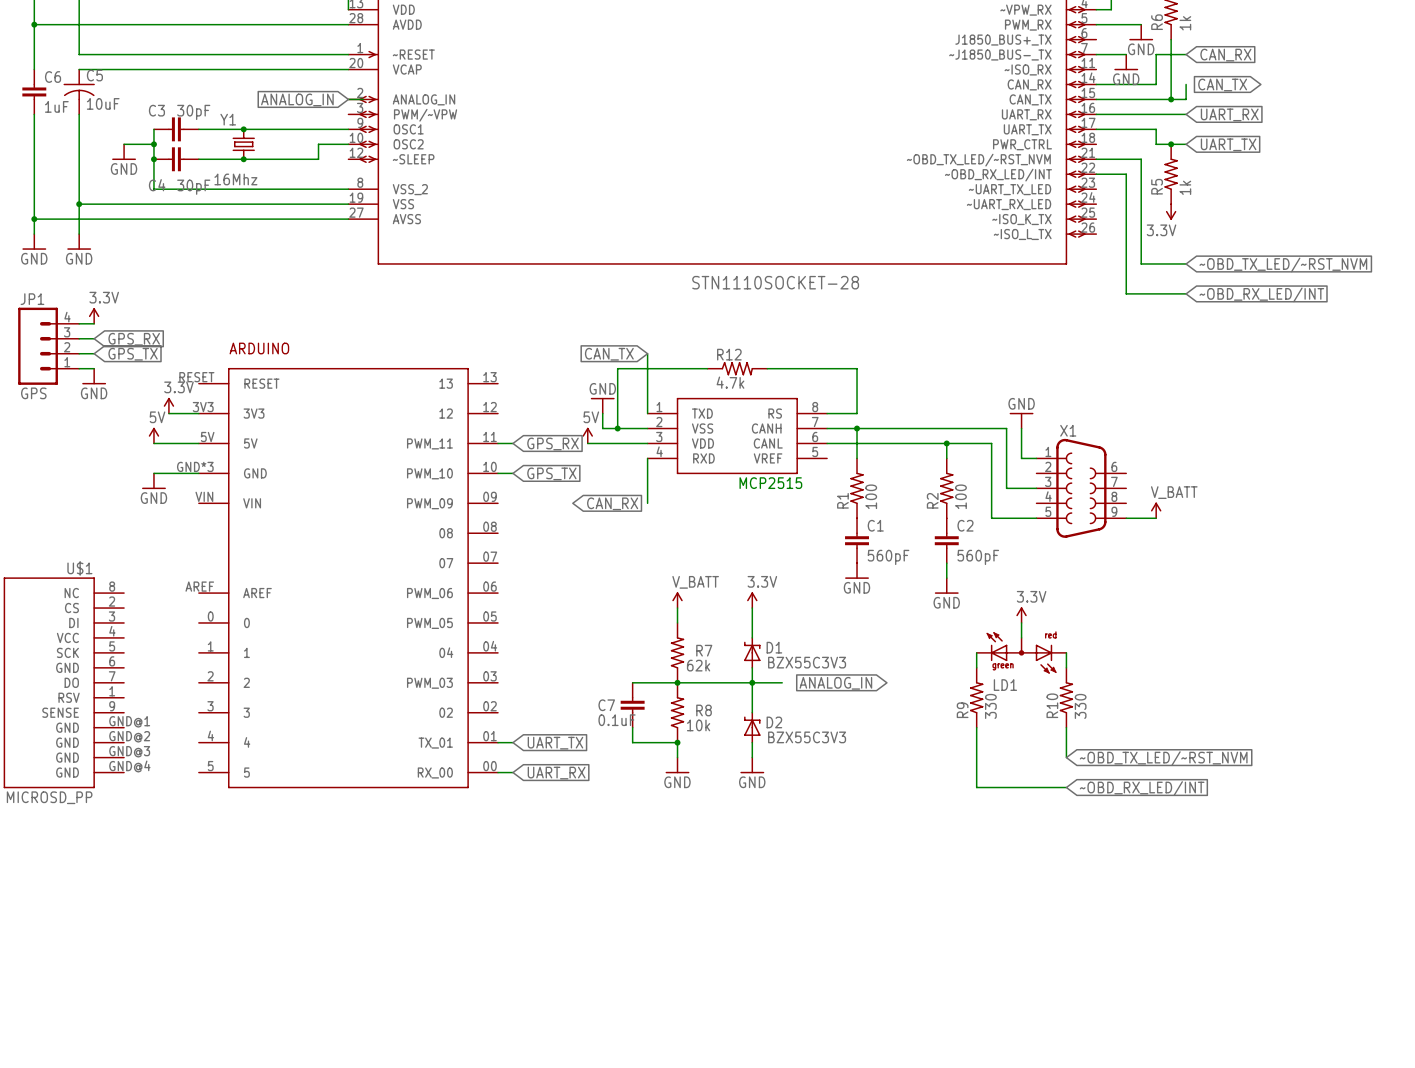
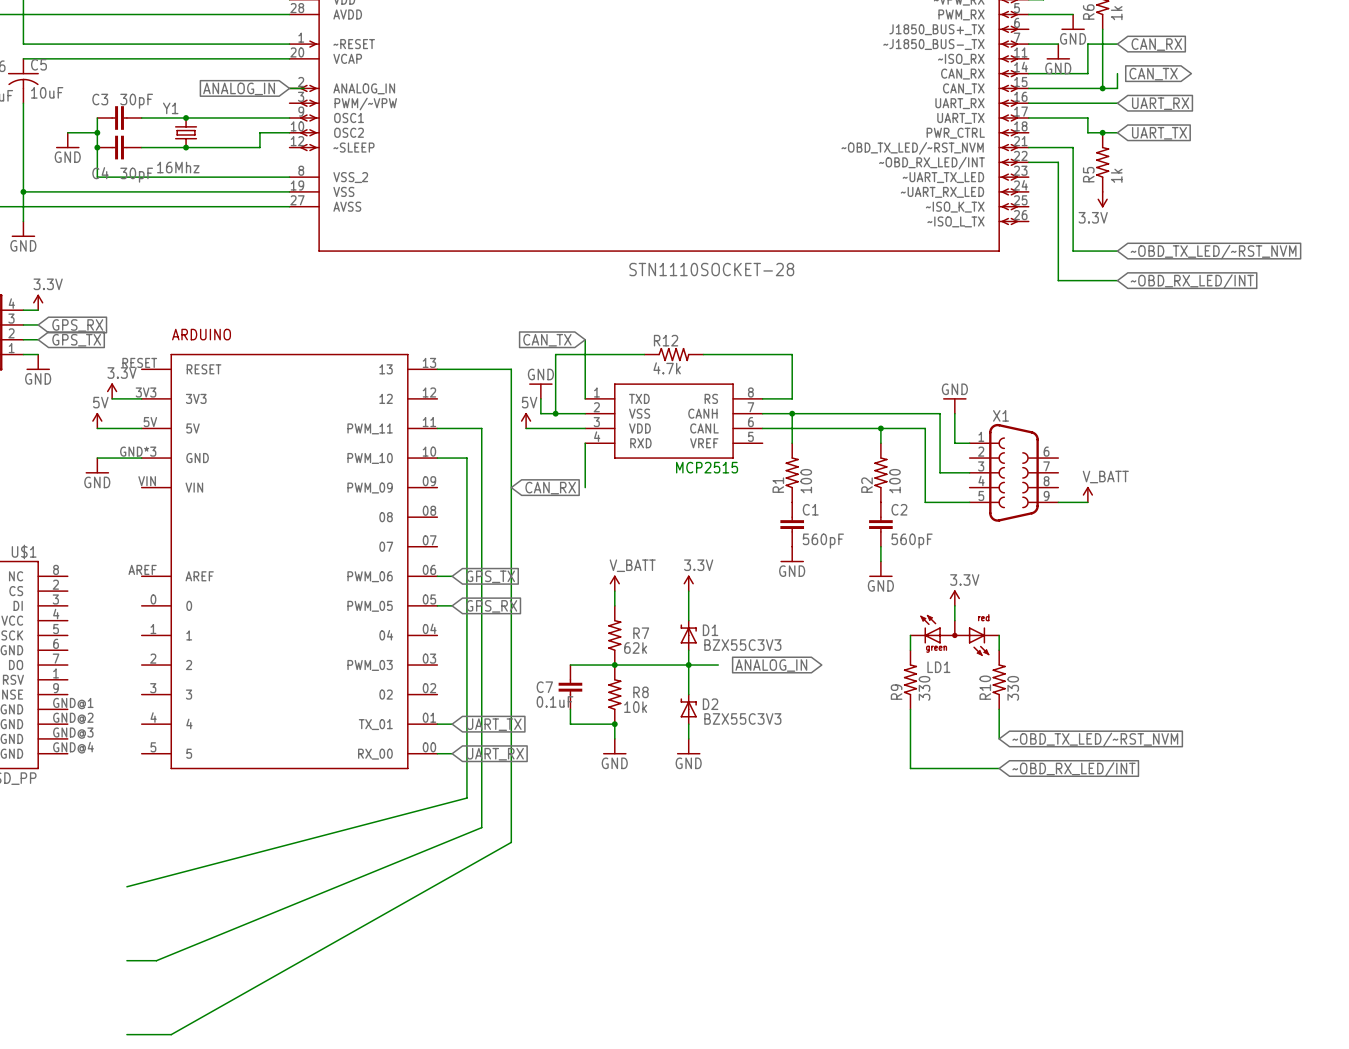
wire: none -> (437, 369) (511, 369) (511, 842) (171, 1034) (126, 1034)
wire: none -> (452, 428) (481, 428) (481, 827) (156, 960) (126, 960)
global label: GPS_RX (553, 443) -> none
wire: none -> (452, 458) (466, 458) (466, 798) (126, 886)
global label position: GPS_TX (551, 473) -> GPS_TX (490, 576)
wire: none -> (437, 576) (452, 576)
wire: none -> (437, 605) (452, 605)
global label: none -> GPS_RX (491, 606)

